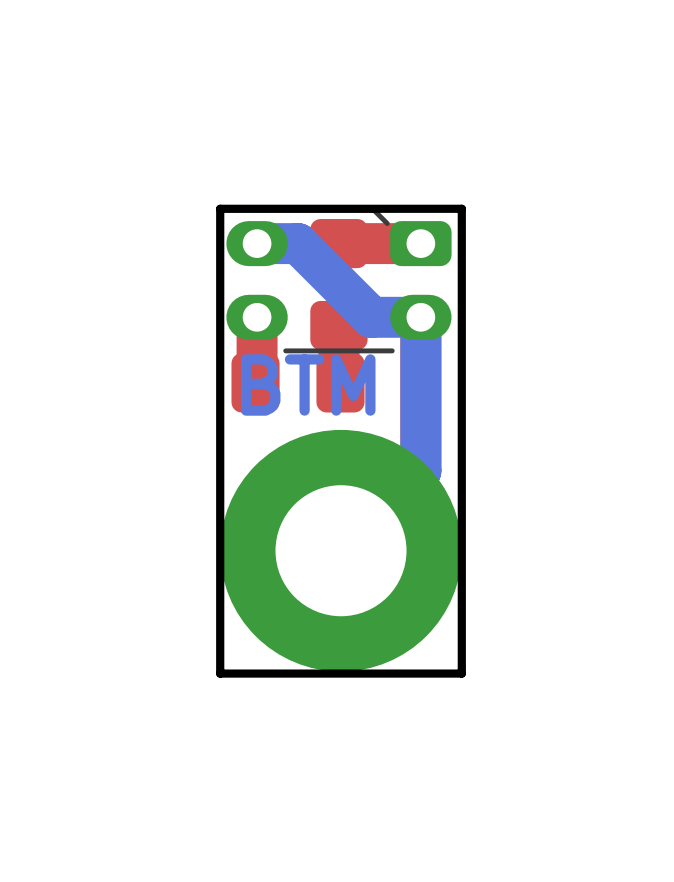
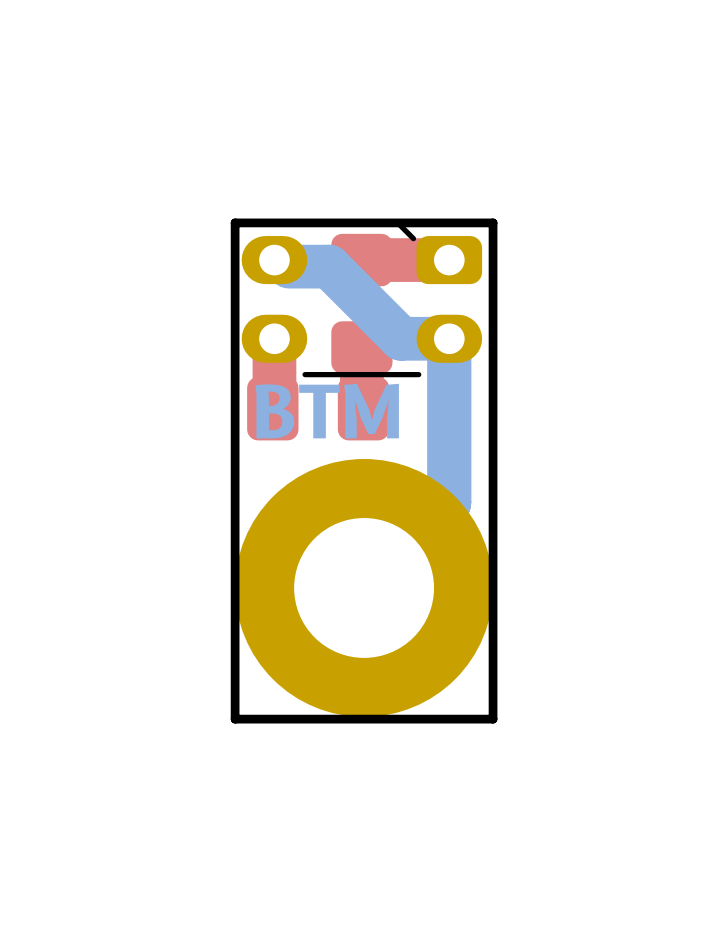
bottom track: (257, 243) (298, 243) (371, 317) (375, 317) -> (289, 266) (329, 266) (401, 338)

